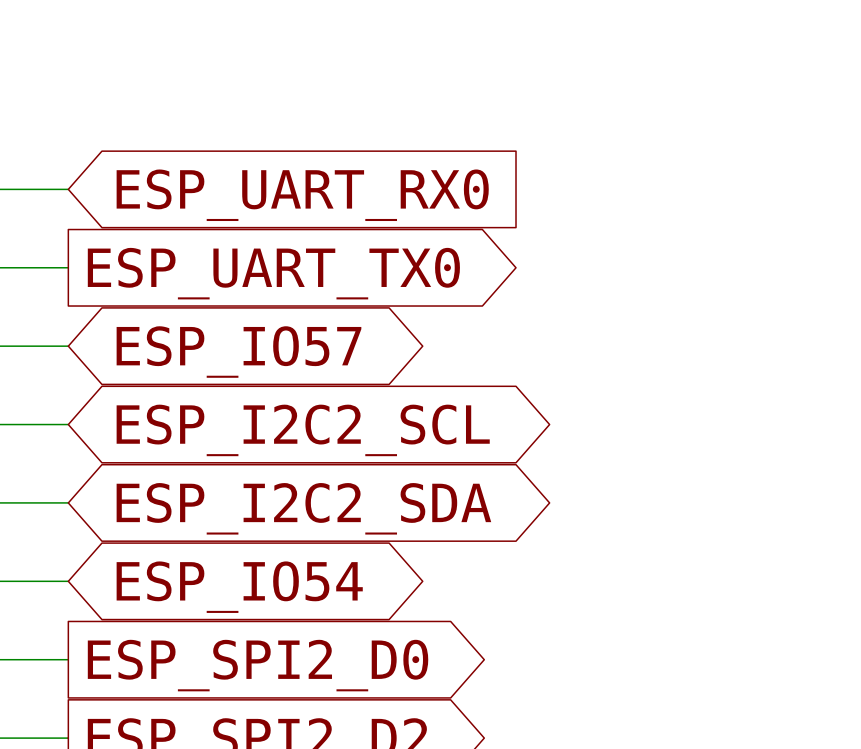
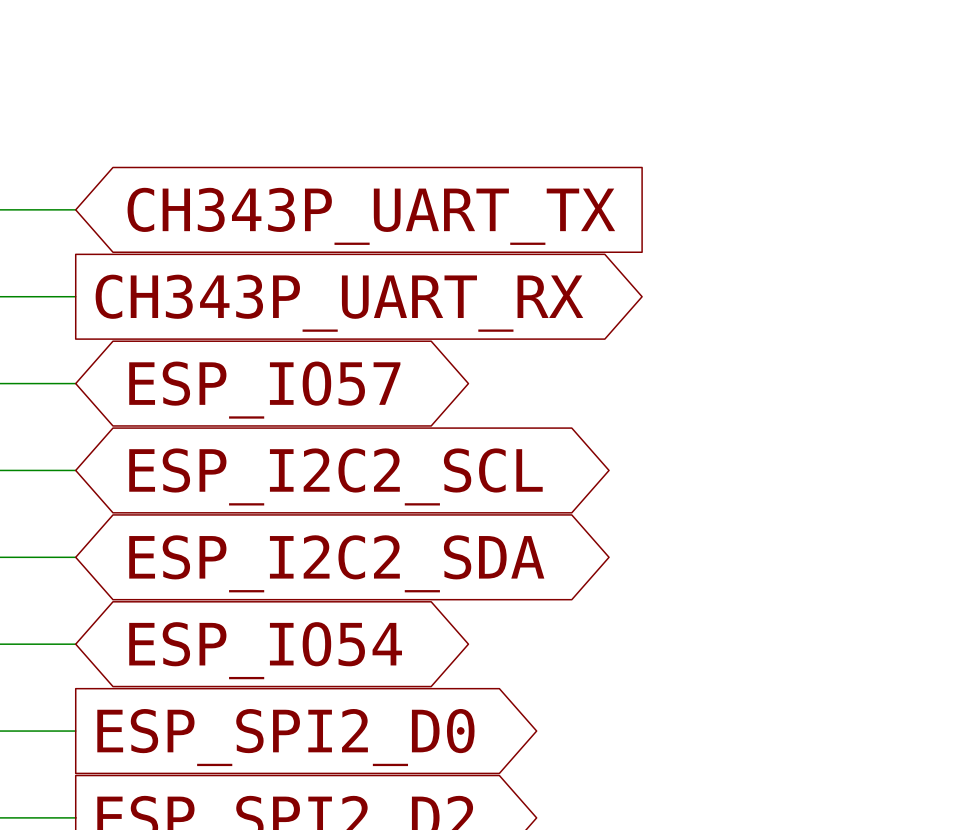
global label: ESP_UART_RX0 (302, 195) -> CH343P_UART_TX (371, 216)
global label: ESP_UART_TX0 (273, 273) -> CH343P_UART_RX (339, 303)

